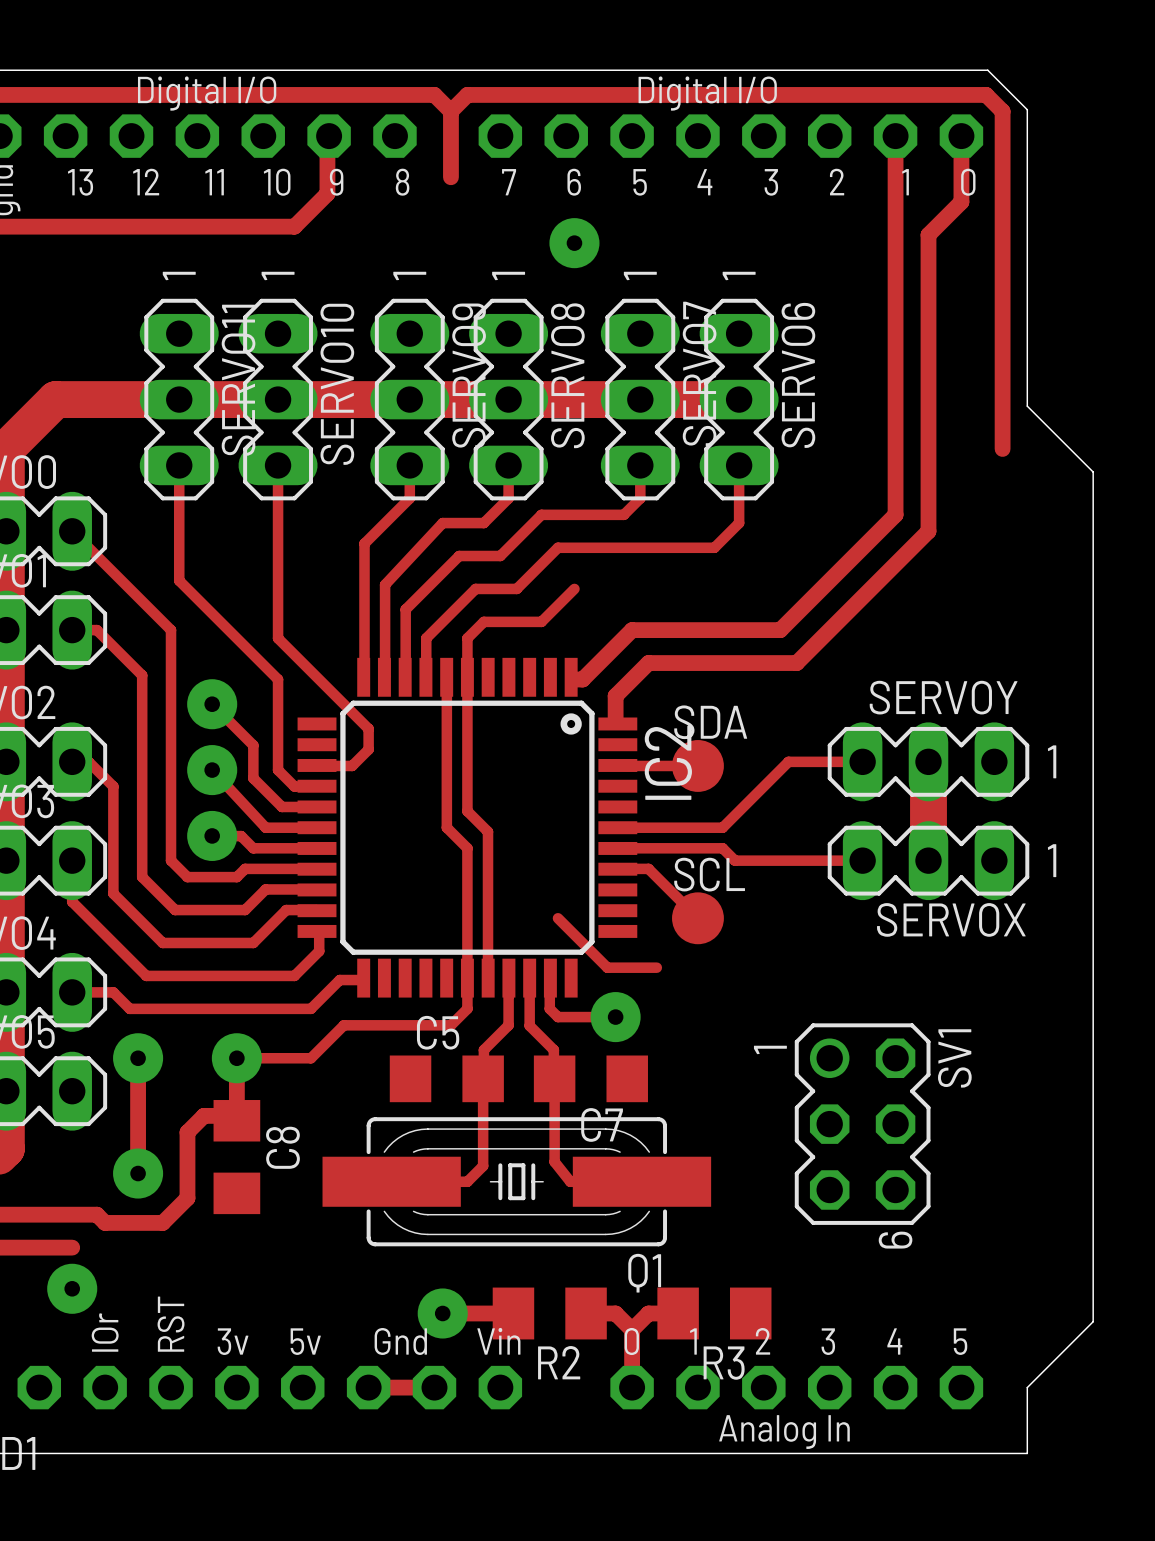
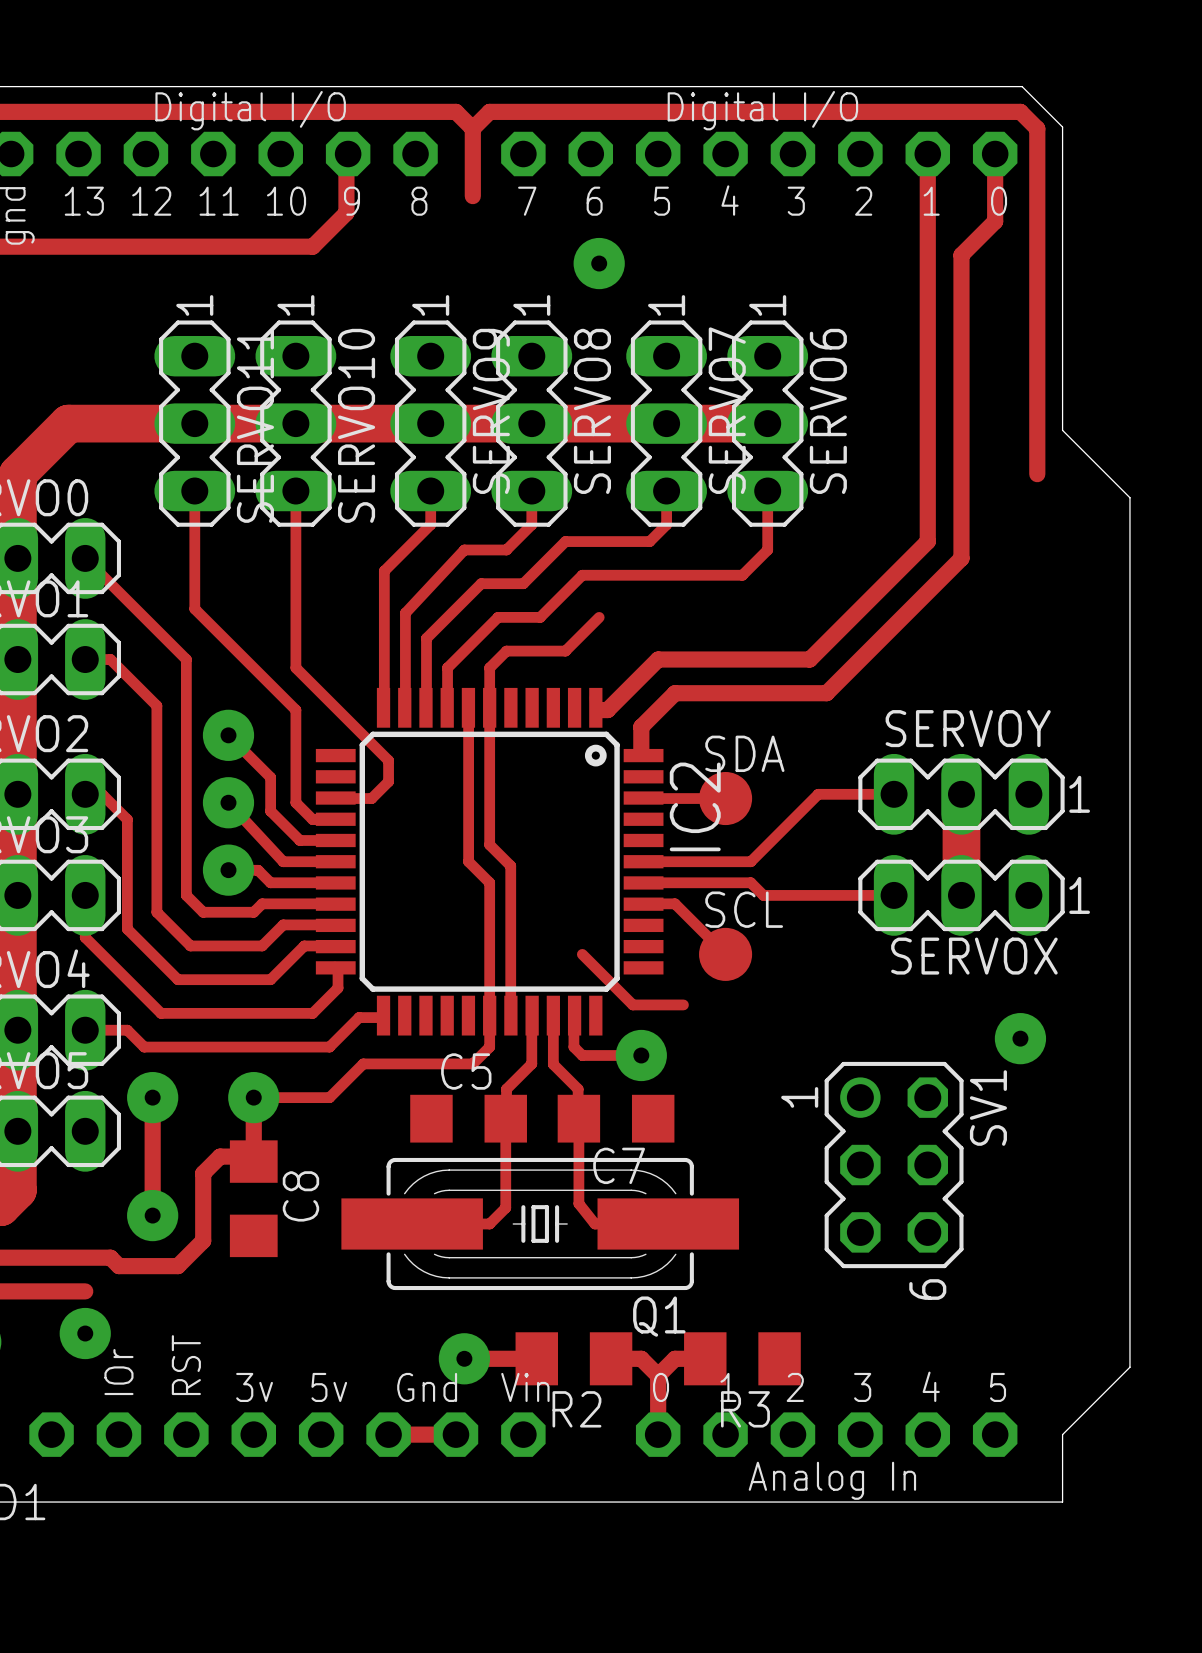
via: none -> (1020, 1038)

